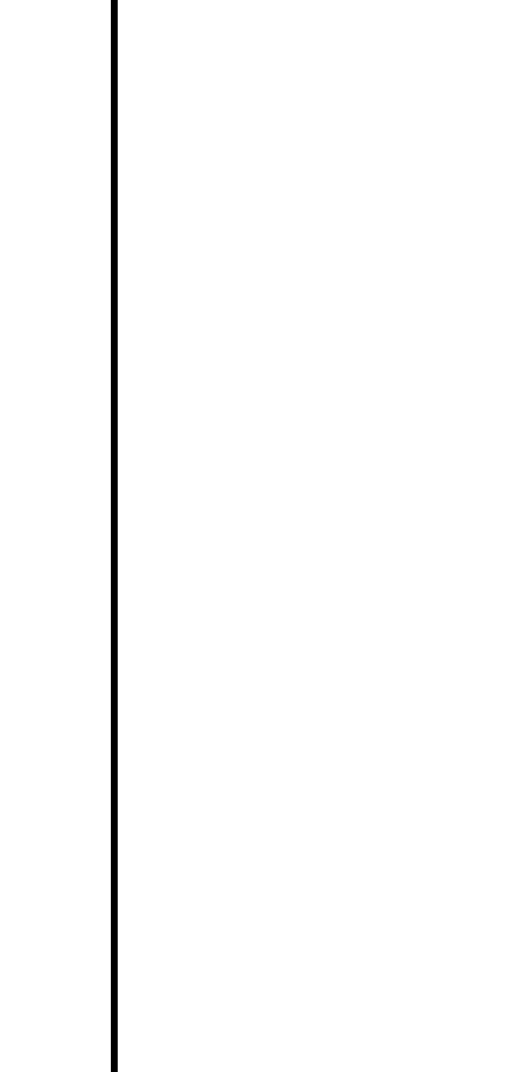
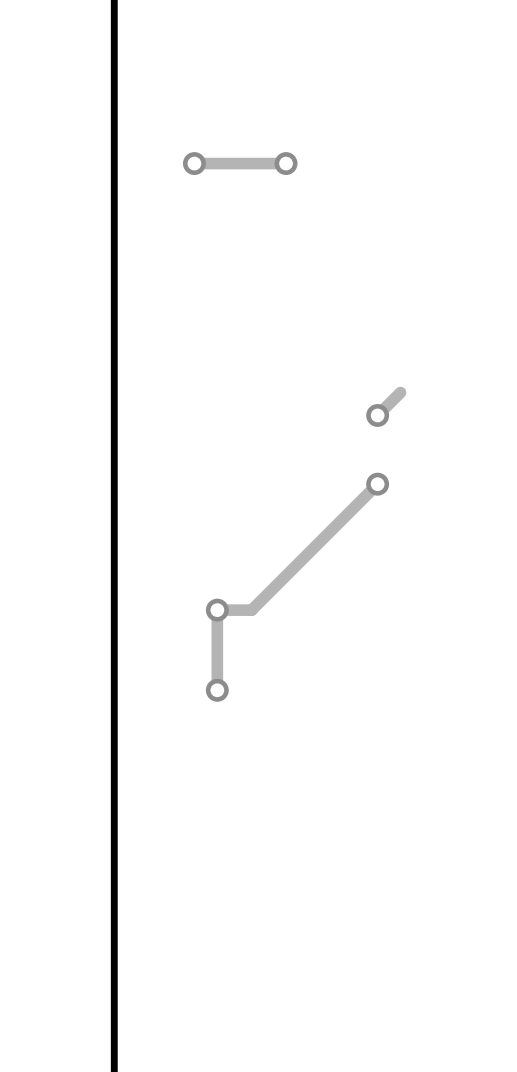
via: none -> (194, 163)
track: none -> (286, 163) (194, 163)
via: none -> (286, 163)
track: none -> (400, 392) (377, 415)
via: none -> (377, 415)
track: none -> (377, 484) (251, 610) (217, 610) (217, 690)
via: none -> (377, 484)
via: none -> (217, 610)
via: none -> (217, 690)

